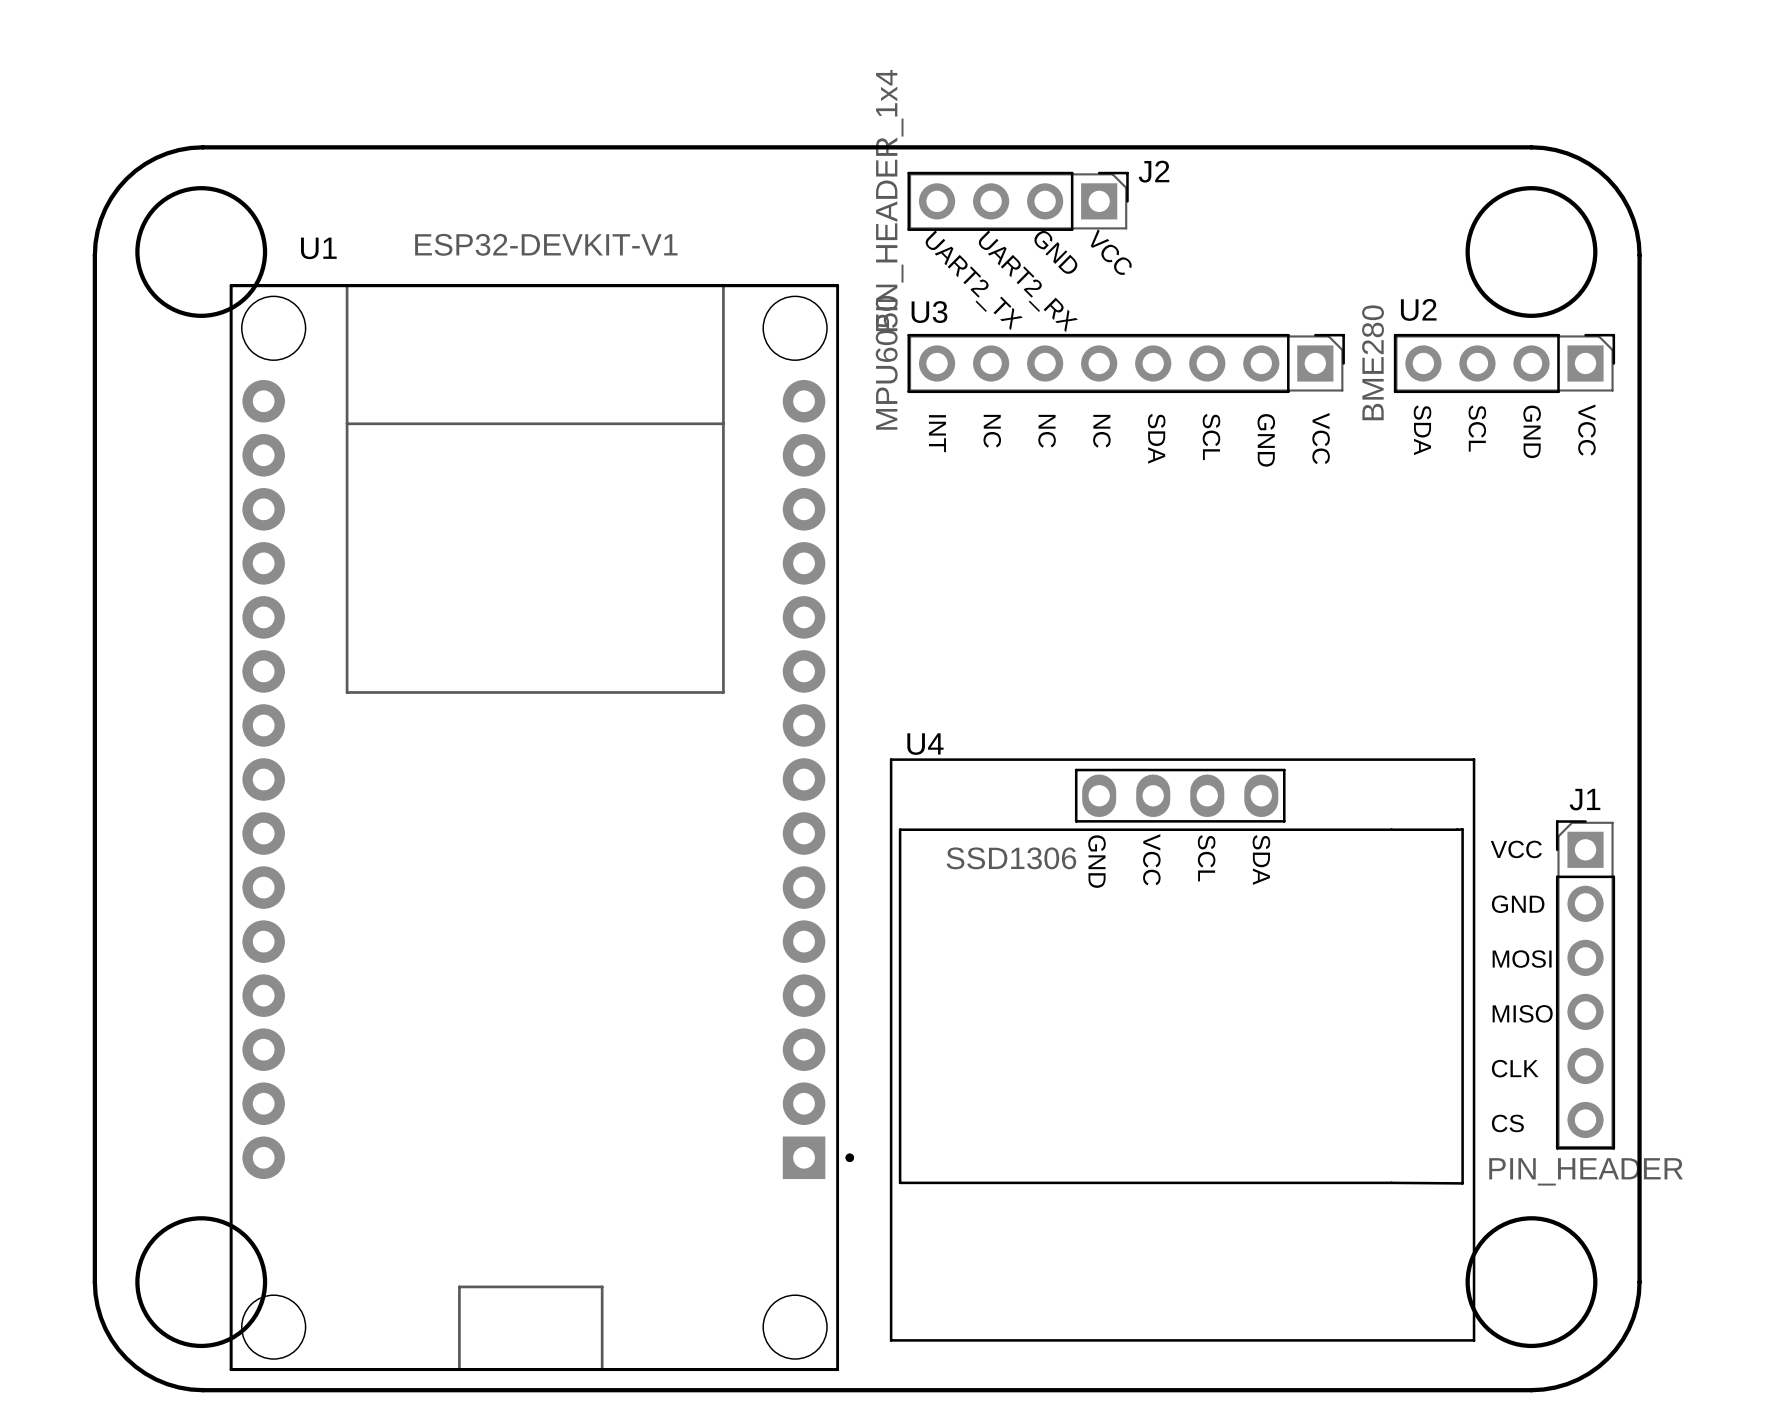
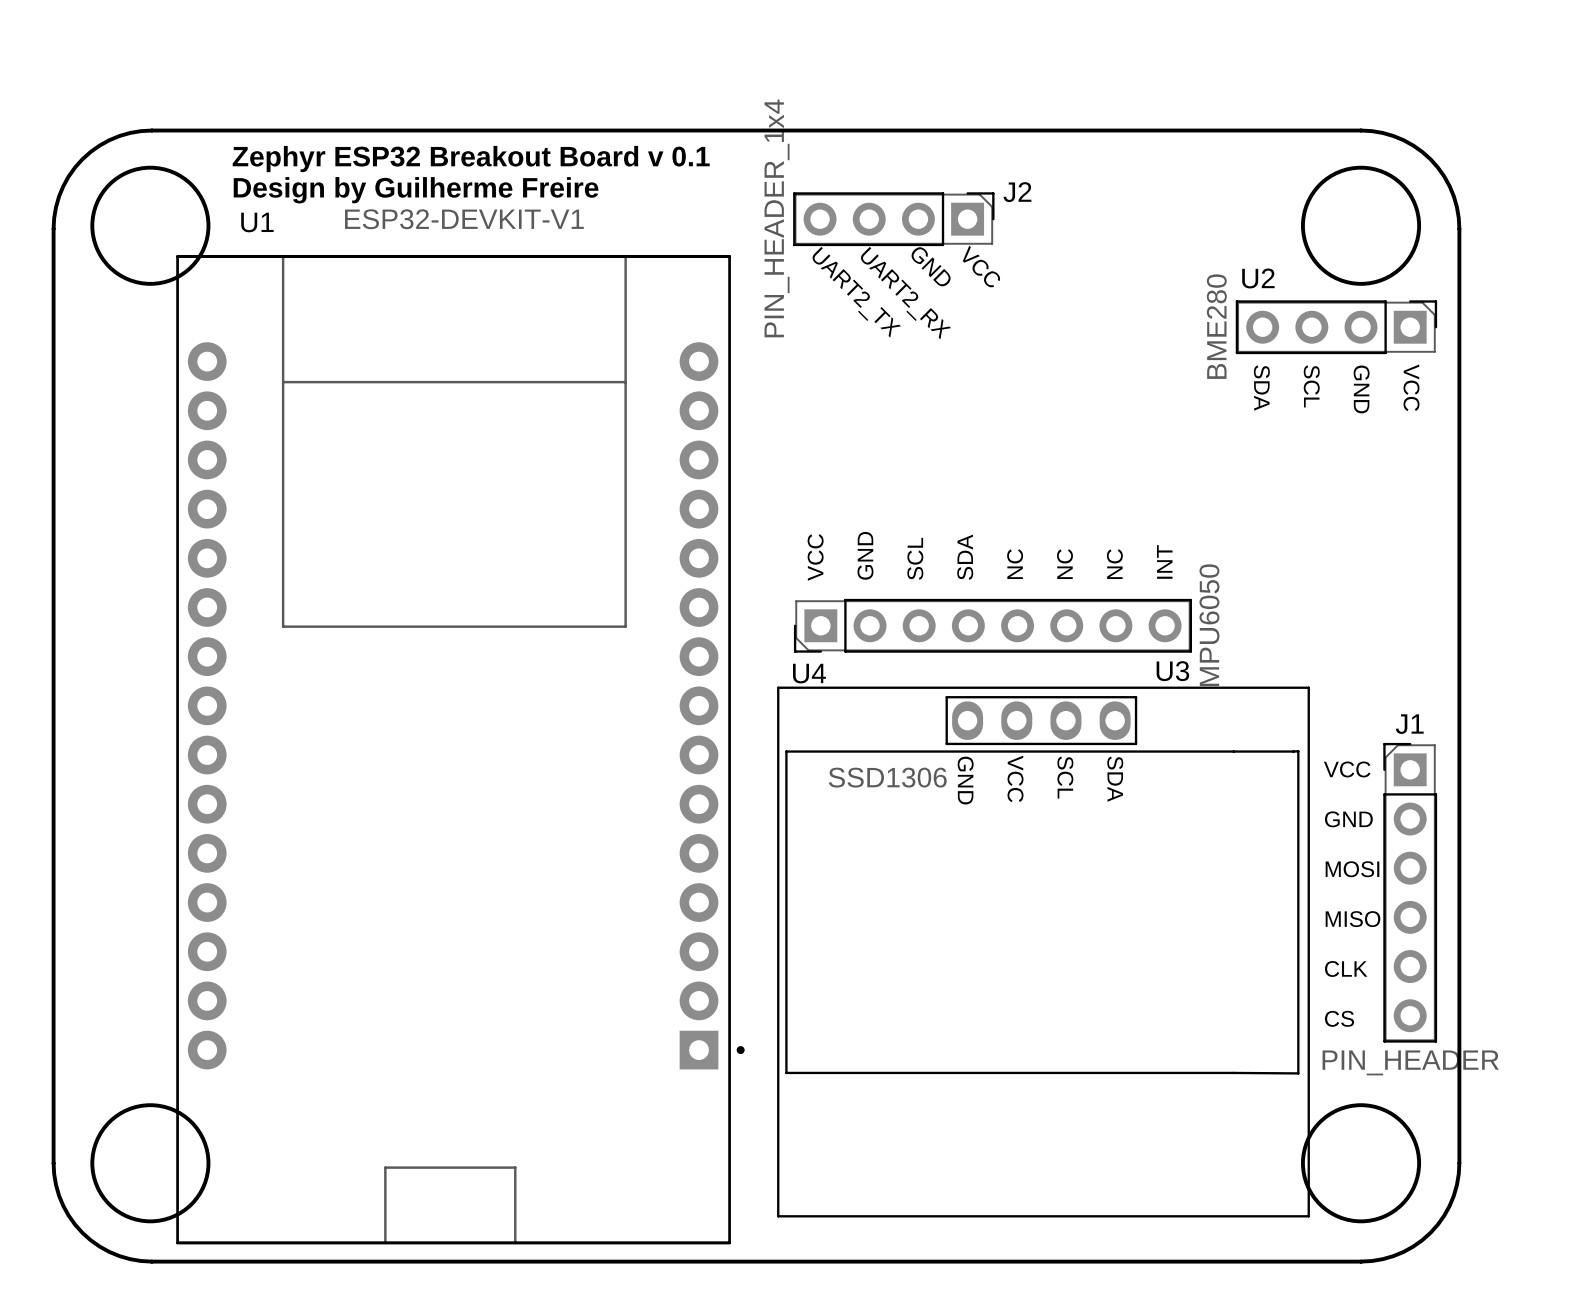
text: none -> Zephyr ESP32 Breakout Board v 0.1 (471, 159)
J2 position: (1018, 201) -> (893, 219)
text: none -> Design by Guilherme Freire (416, 190)
text position: GND (1055, 252) -> GND (931, 266)
text position: VCC (1111, 252) -> VCC (981, 266)
text position: UART2_TX (974, 280) -> UART2_TX (856, 292)
text position: UART2_RX (1028, 281) -> UART2_RX (905, 293)
U1 footprint: [229, 284, 855, 1372] -> [176, 255, 745, 1245]
U3 rotation: 0° (1126, 363) -> 180° (992, 625)
U3 position: (1126, 363) -> (992, 625)
text: NC (992, 431) -> none
text: NC (1047, 431) -> none
text: NC (1101, 431) -> none
text rotation: 0° (937, 433) -> 180° (1164, 561)
text position: INT (937, 433) -> INT (1164, 561)
text rotation: 0° (1211, 437) -> 180° (915, 558)
text position: SCL (1211, 437) -> SCL (915, 558)
text rotation: 0° (1156, 438) -> 180° (965, 557)
text position: SDA (1156, 438) -> SDA (965, 557)
text: VCC (1321, 438) -> none
text: GND (1266, 440) -> none
text: none -> GND (865, 555)
text: none -> VCC (815, 557)
text: none -> NC (1015, 564)
text: none -> NC (1064, 564)
text: none -> NC (1114, 564)

